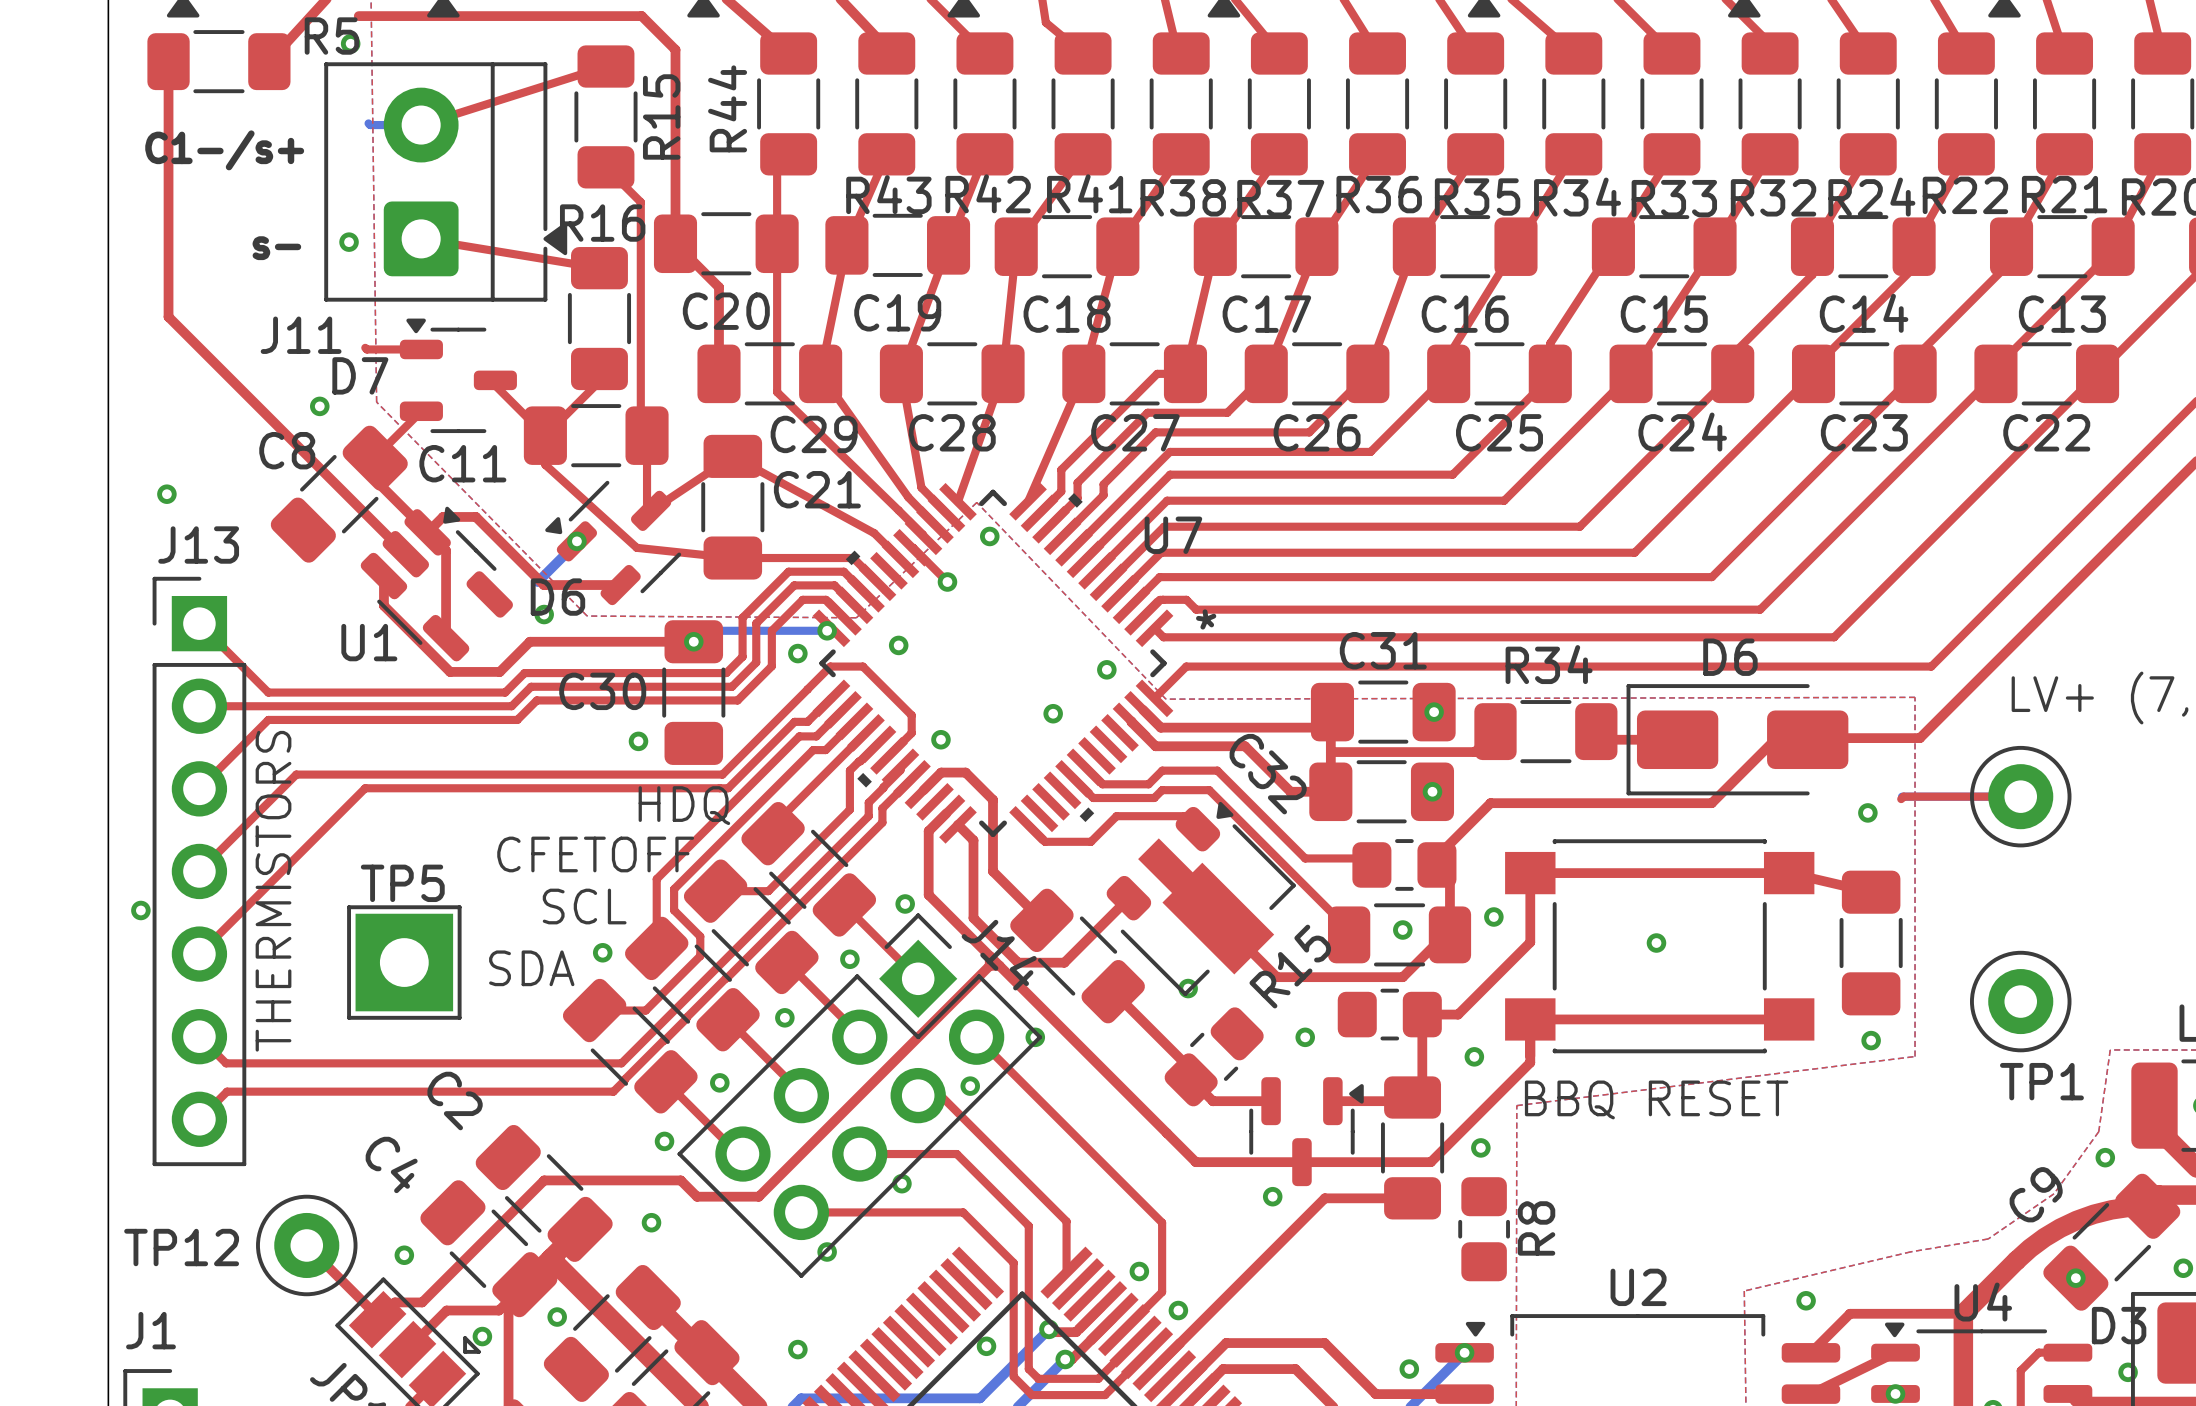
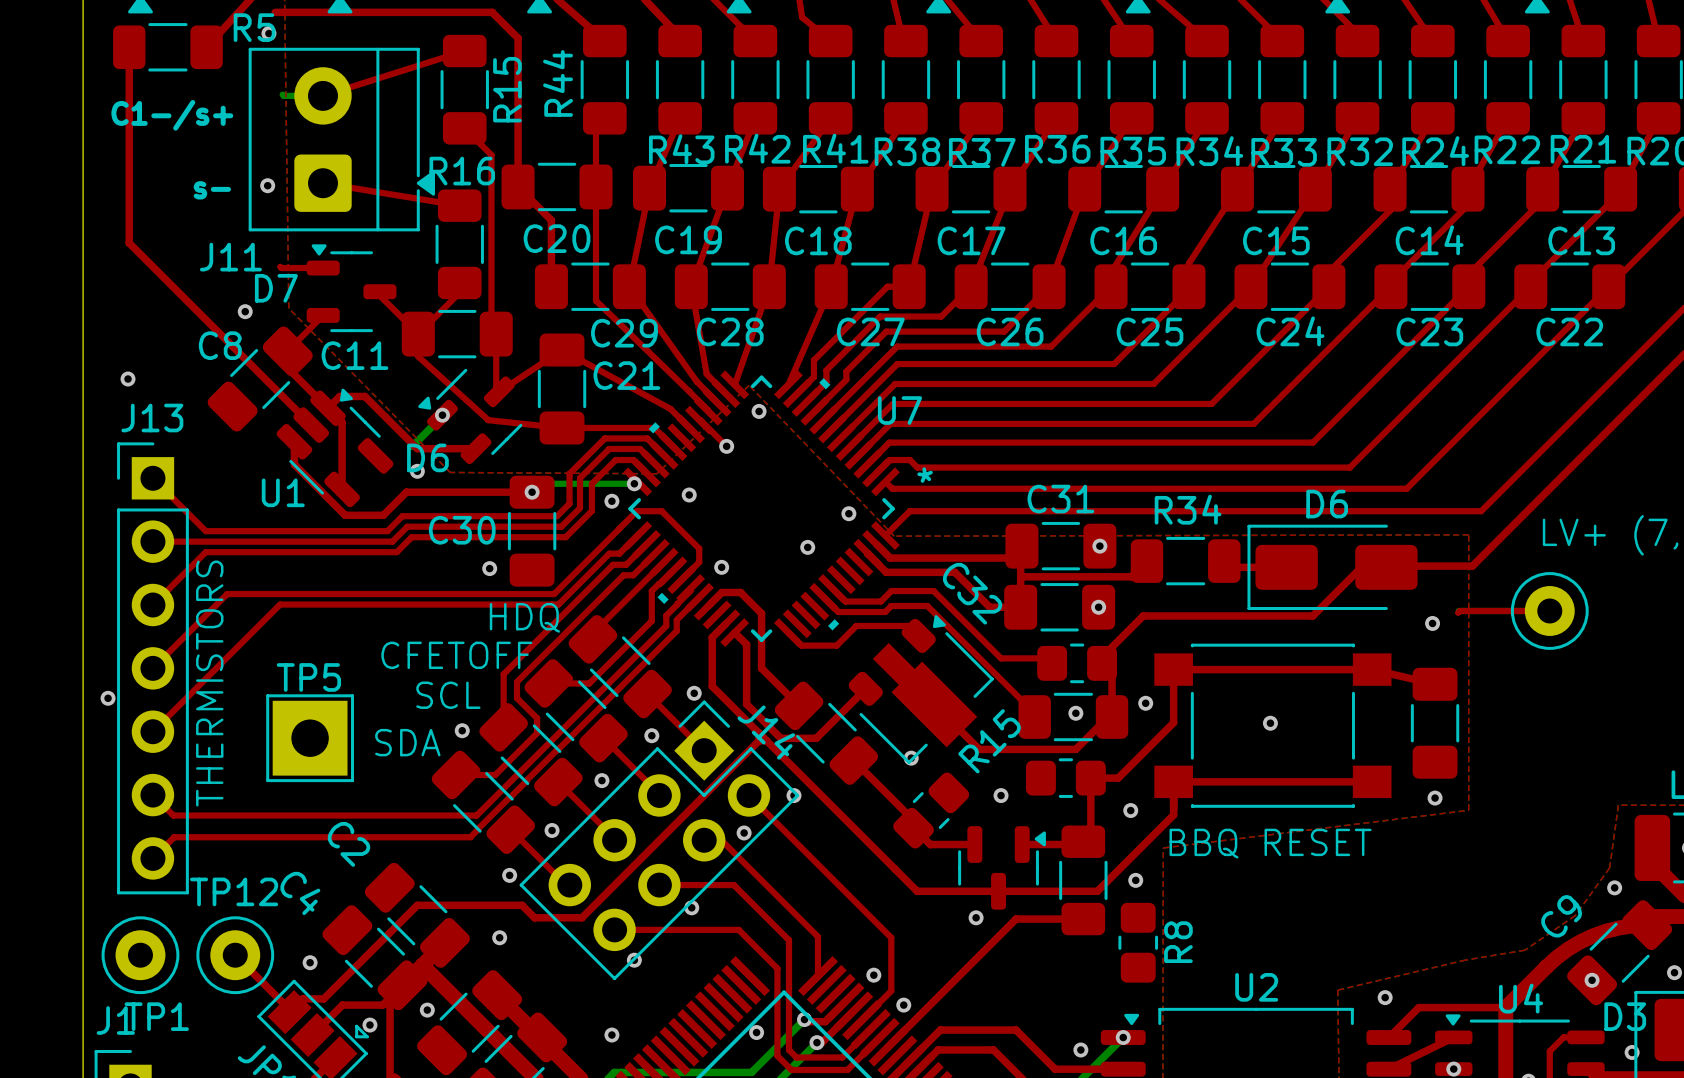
TP1 position: (2020, 1001) -> (140, 955)
TP12 name position: TP12 (181, 1247) -> TP12 (234, 891)

